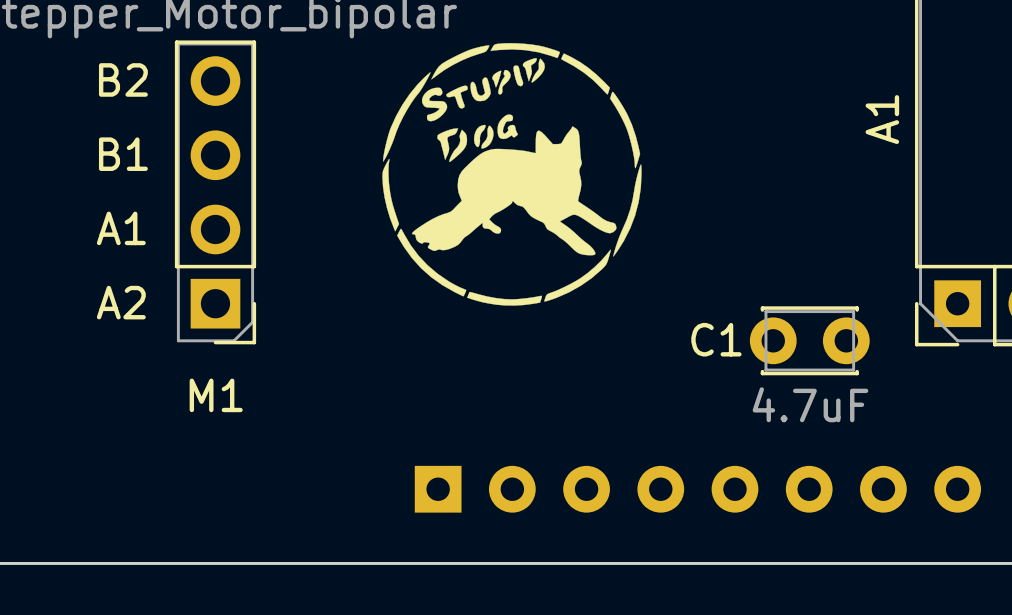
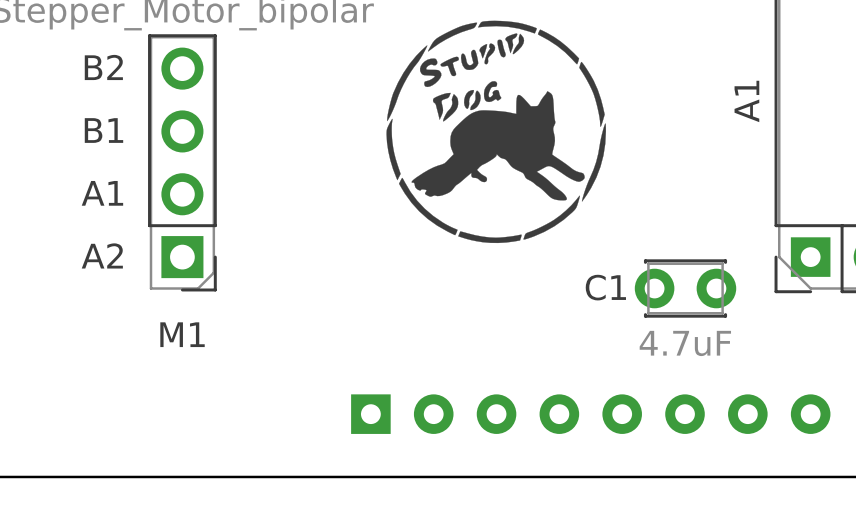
drawing position: (511, 174) -> (496, 131)

